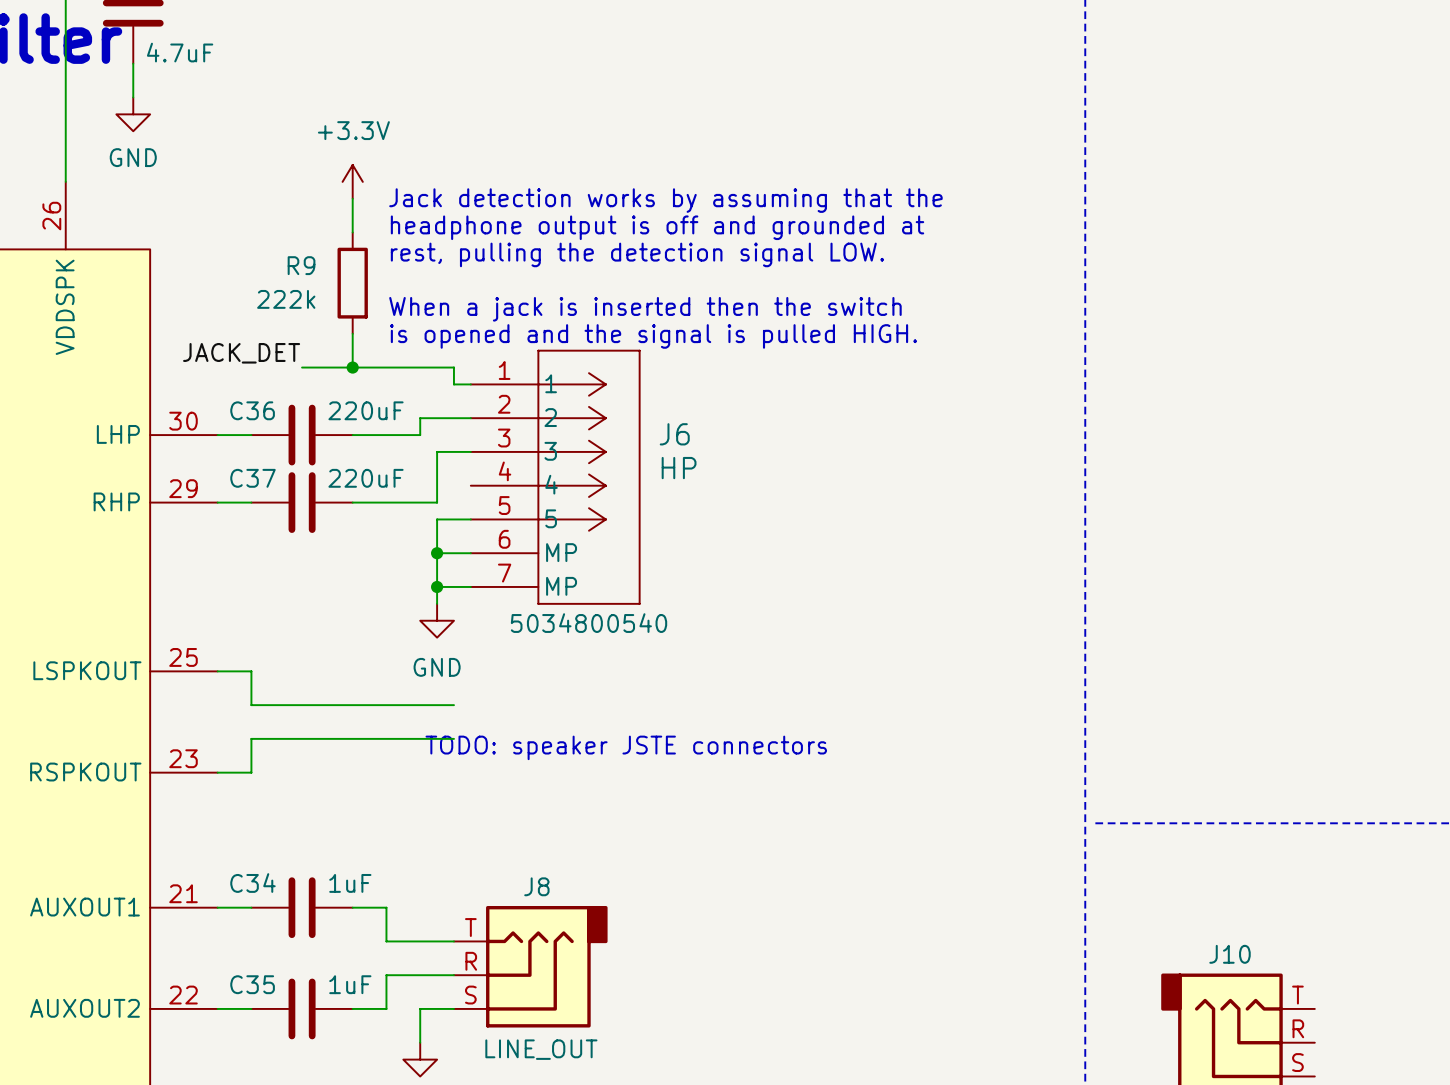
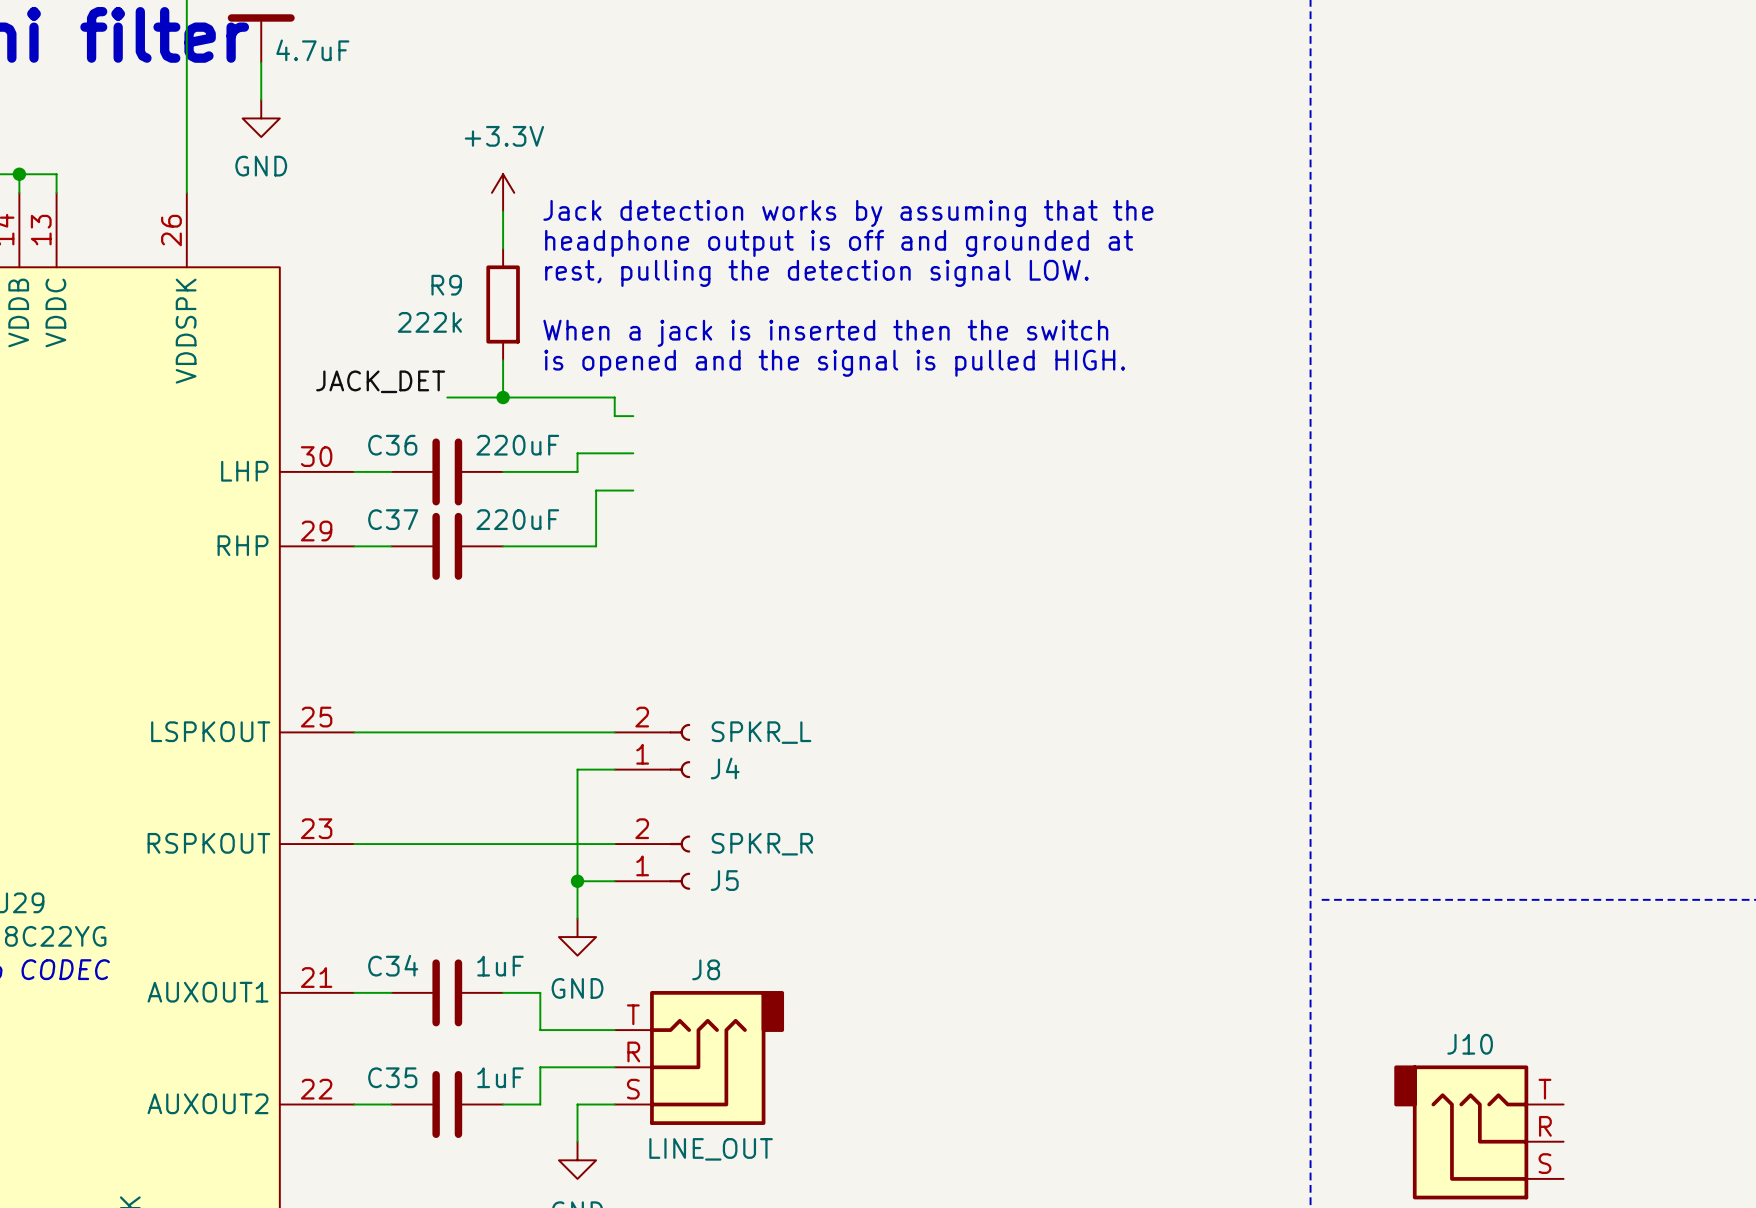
J6: HP (555, 477) -> none
wire: (470, 519) (437, 519) (437, 603) -> none
wire: (437, 553) (470, 553) -> none
junction: (437, 553) -> none
wire: (437, 586) (470, 586) -> (577, 881) (614, 881)
junction: (437, 586) -> none
power symbol position: GND (437, 620) -> GND (577, 937)
wire: (251, 671) (251, 705) (420, 705) -> (391, 732) (614, 732)
J4: none -> SPKR_L (652, 751)
wire: none -> (577, 769) (577, 918)
wire: (453, 738) (251, 738) (251, 772) -> (614, 844) (391, 844)
text: TODO: speaker JSTE connectors (626, 747) -> none
J5: none -> SPKR_R (652, 862)
junction: none -> (577, 881)

